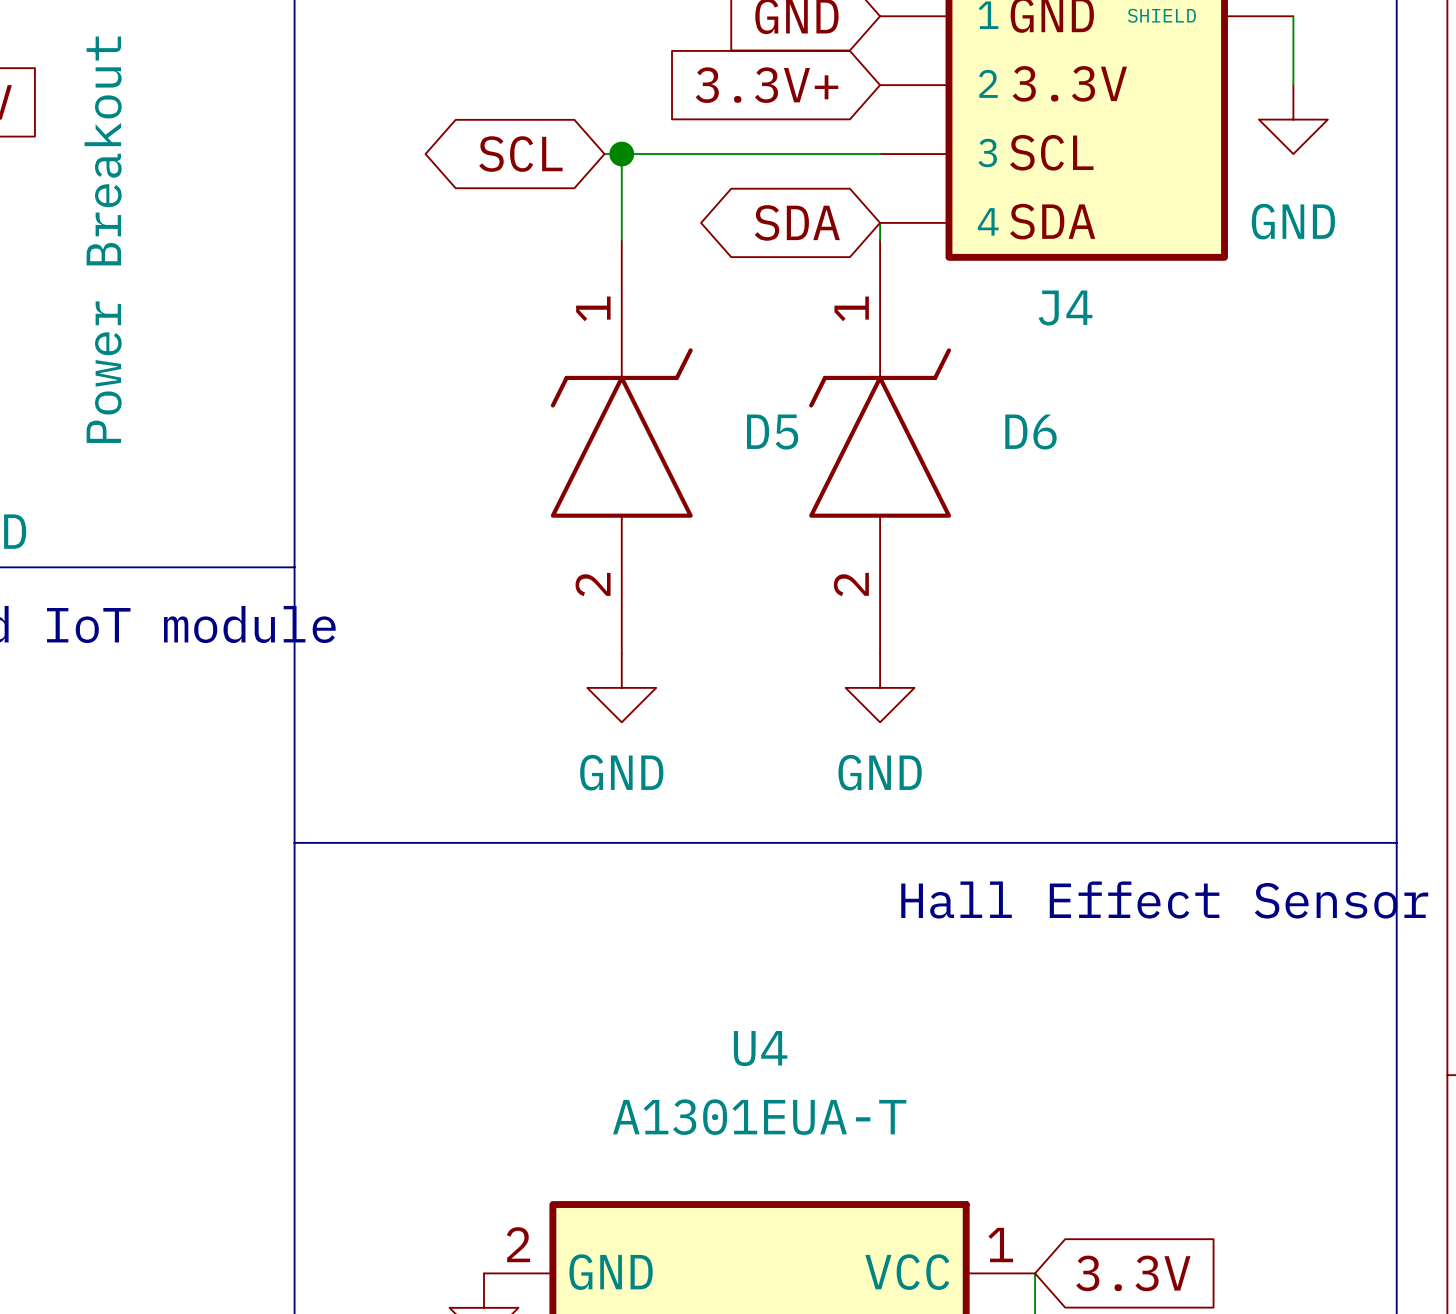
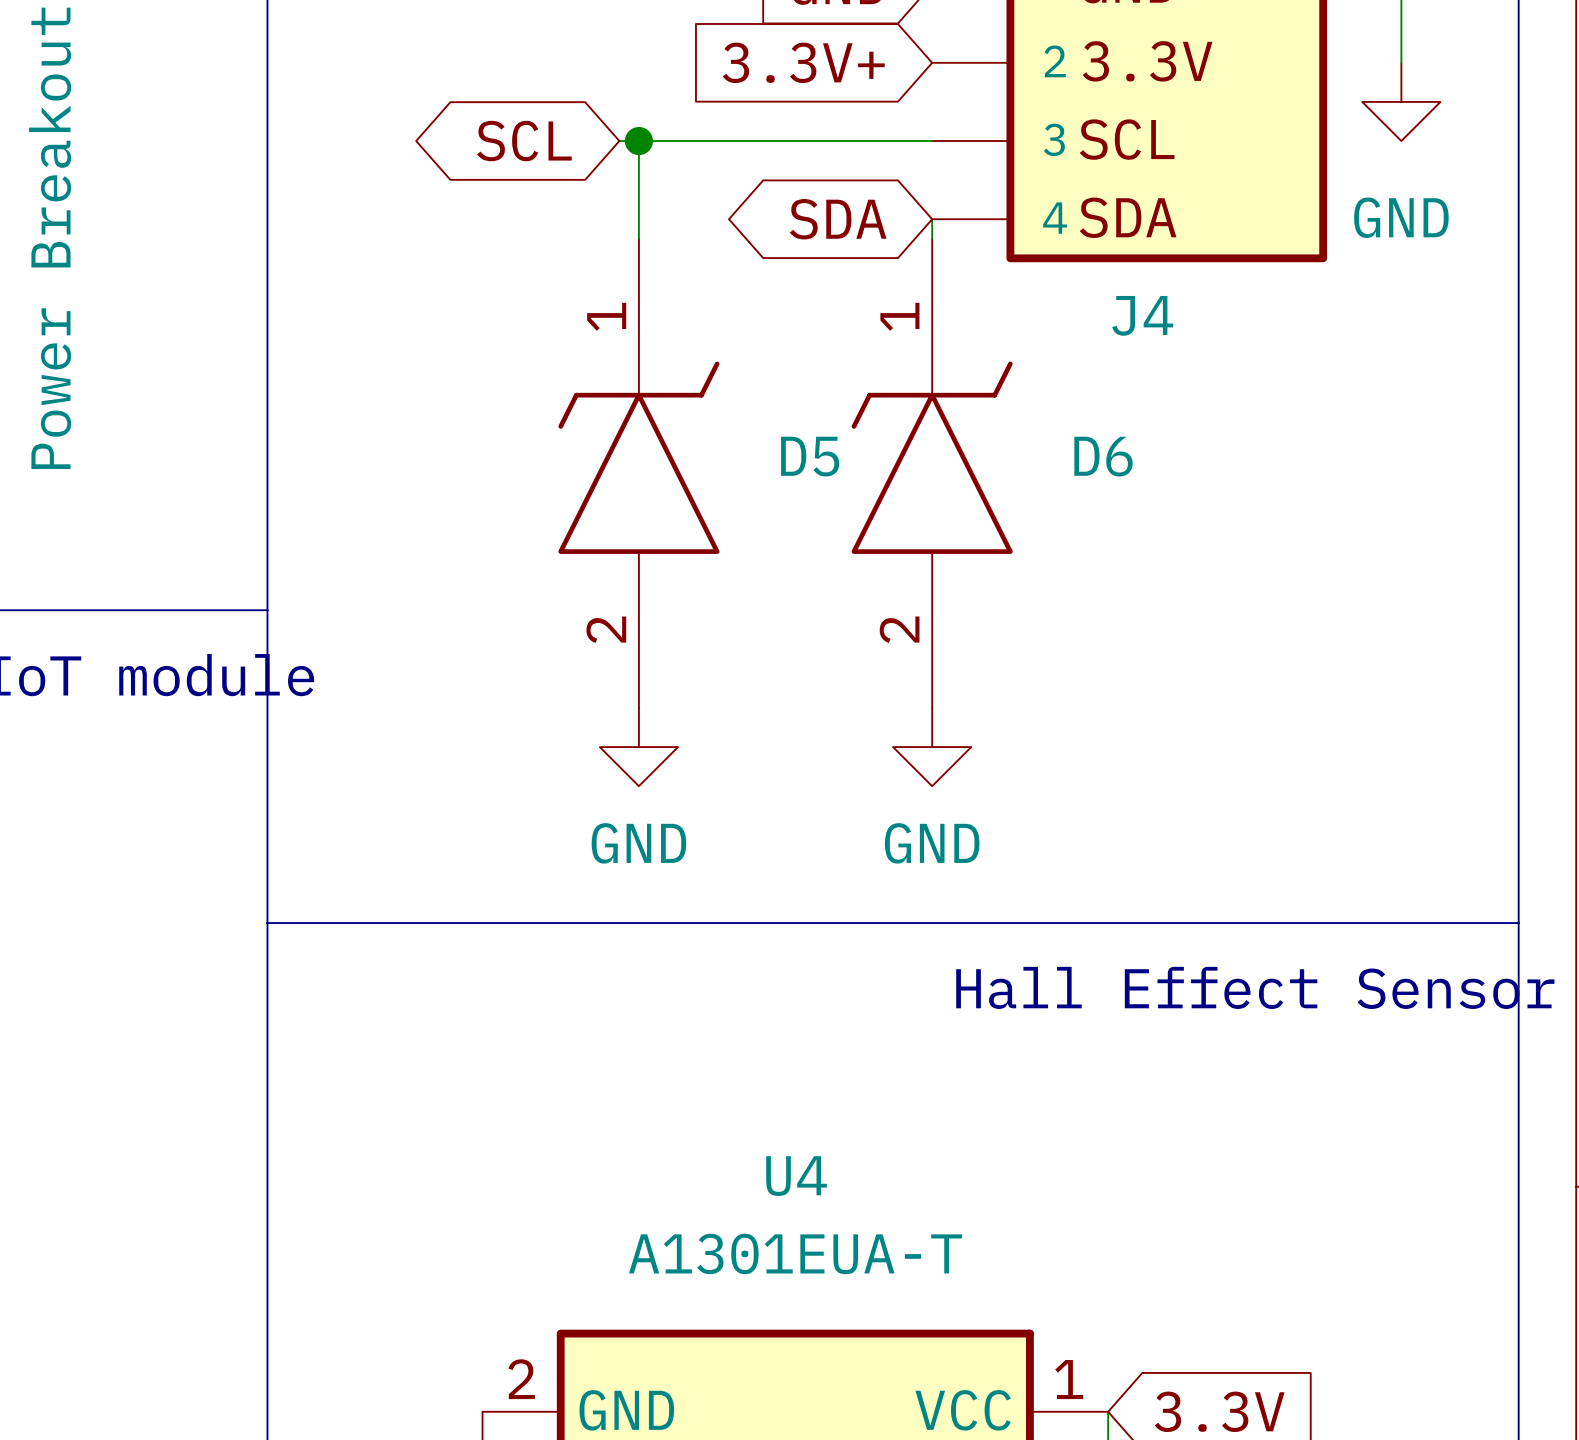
U4 name position: U4 (760, 1048) -> U4 (796, 1176)
U4 value position: A1301EUA-T (759, 1117) -> A1301EUA-T (795, 1253)

